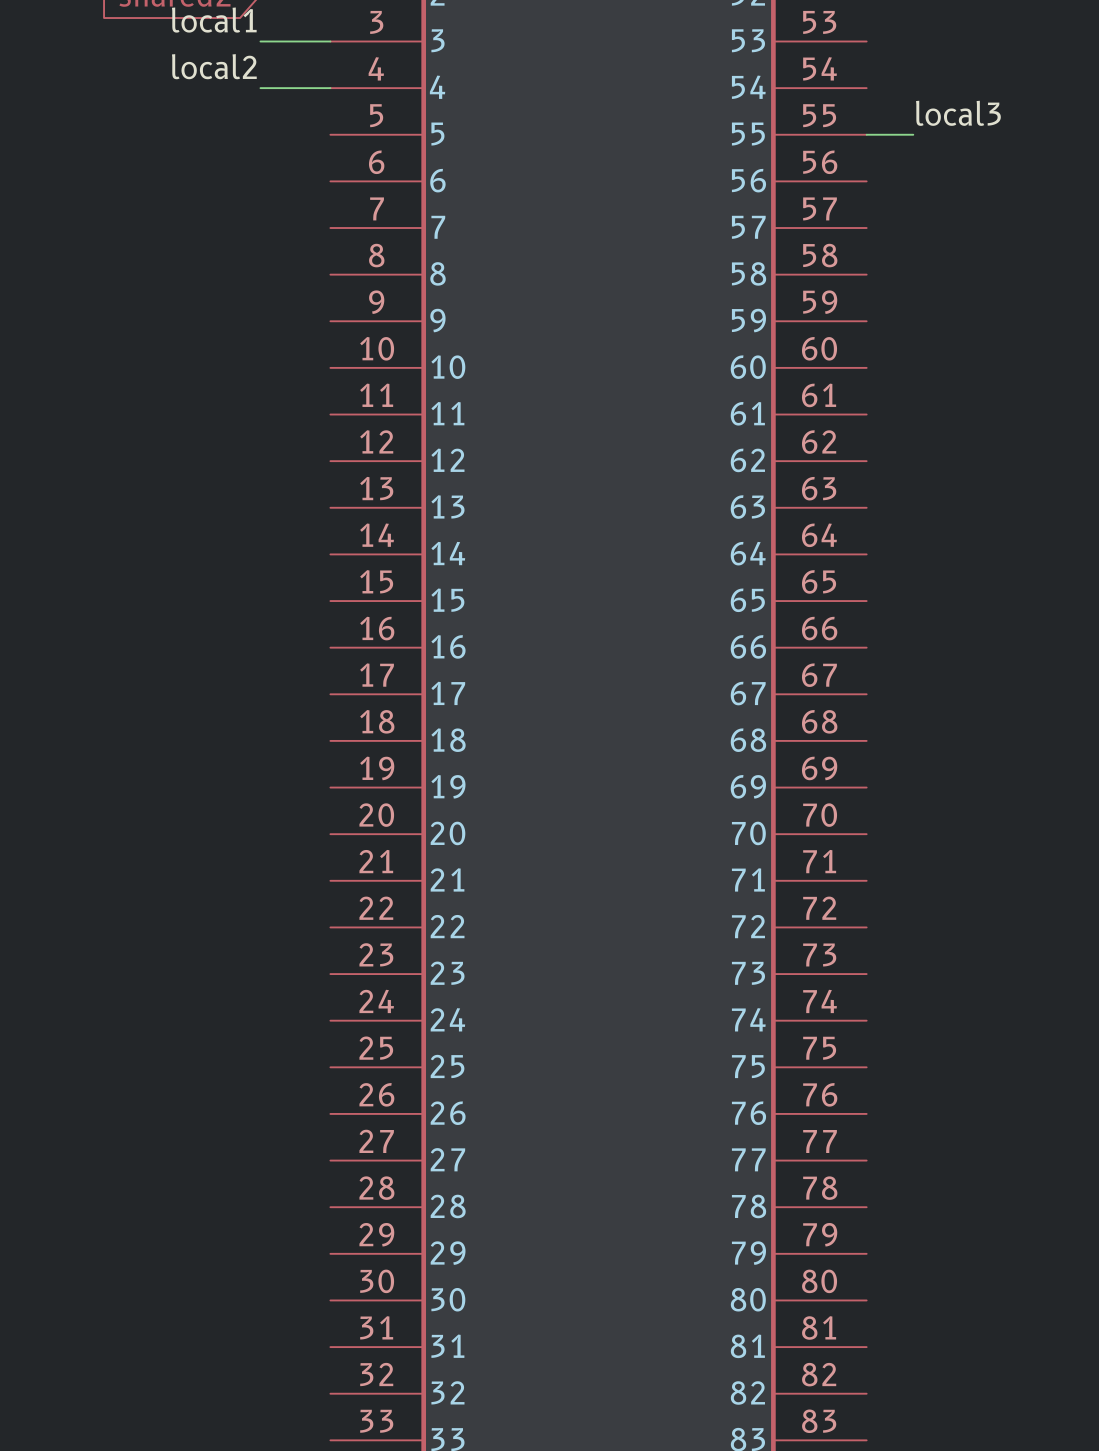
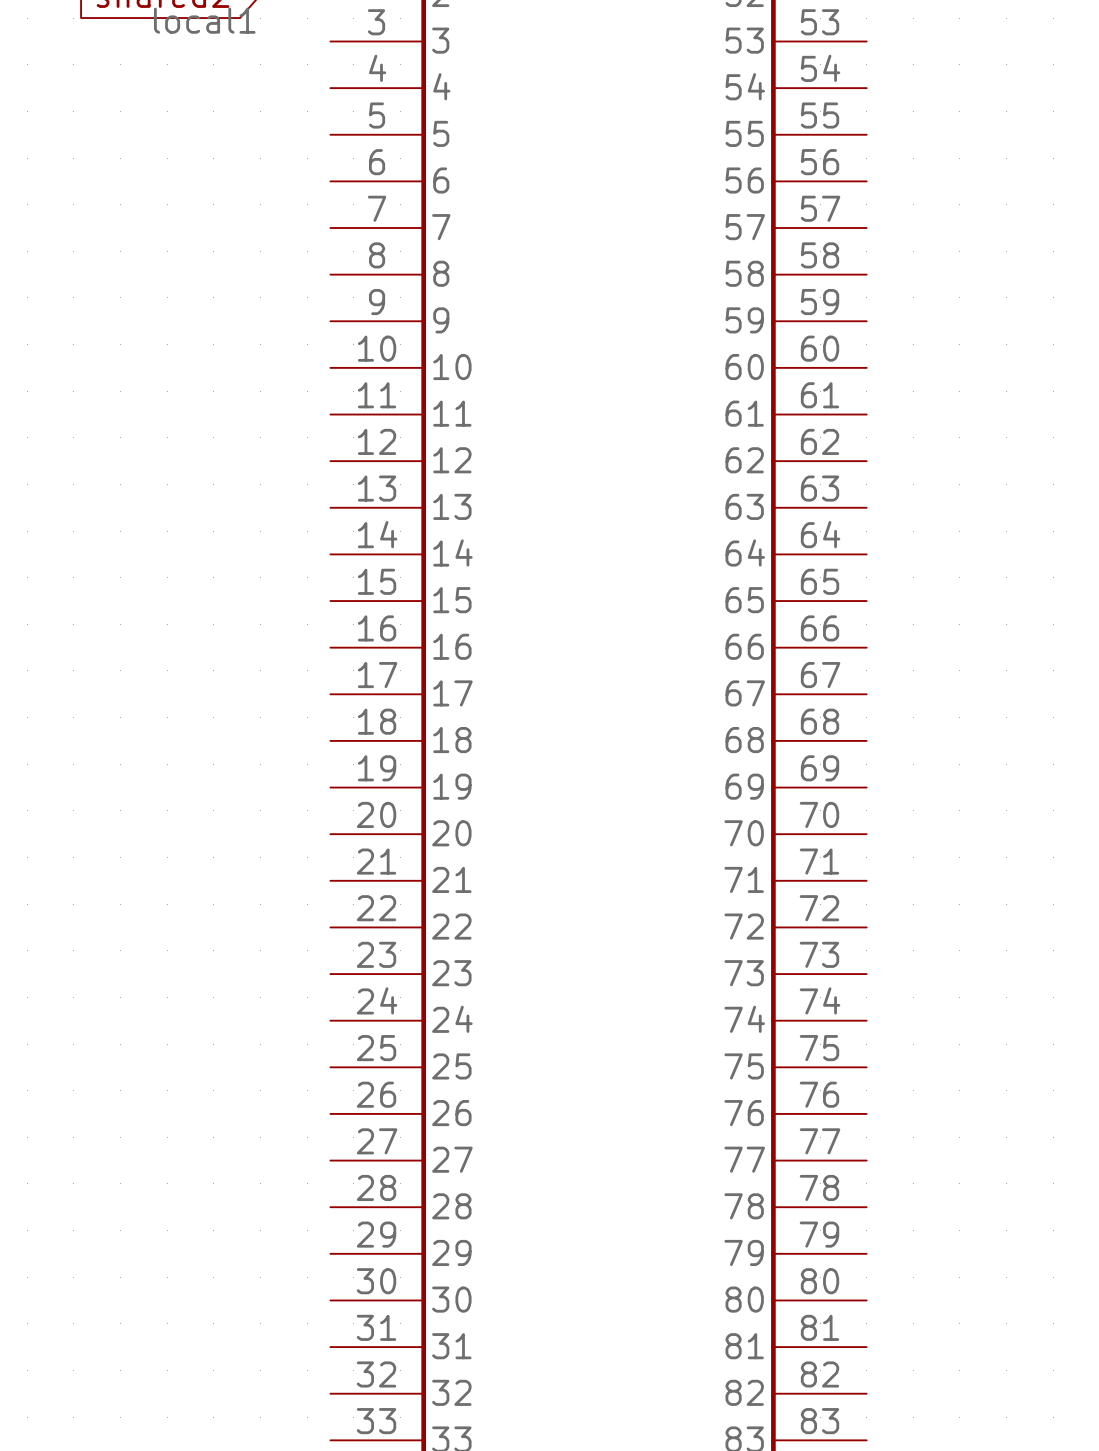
wire: (260, 41) (330, 41) -> none
label: local2 (214, 66) -> none
wire: (260, 88) (330, 88) -> none
label: local3 (958, 113) -> none
wire: (866, 134) (913, 134) -> none

